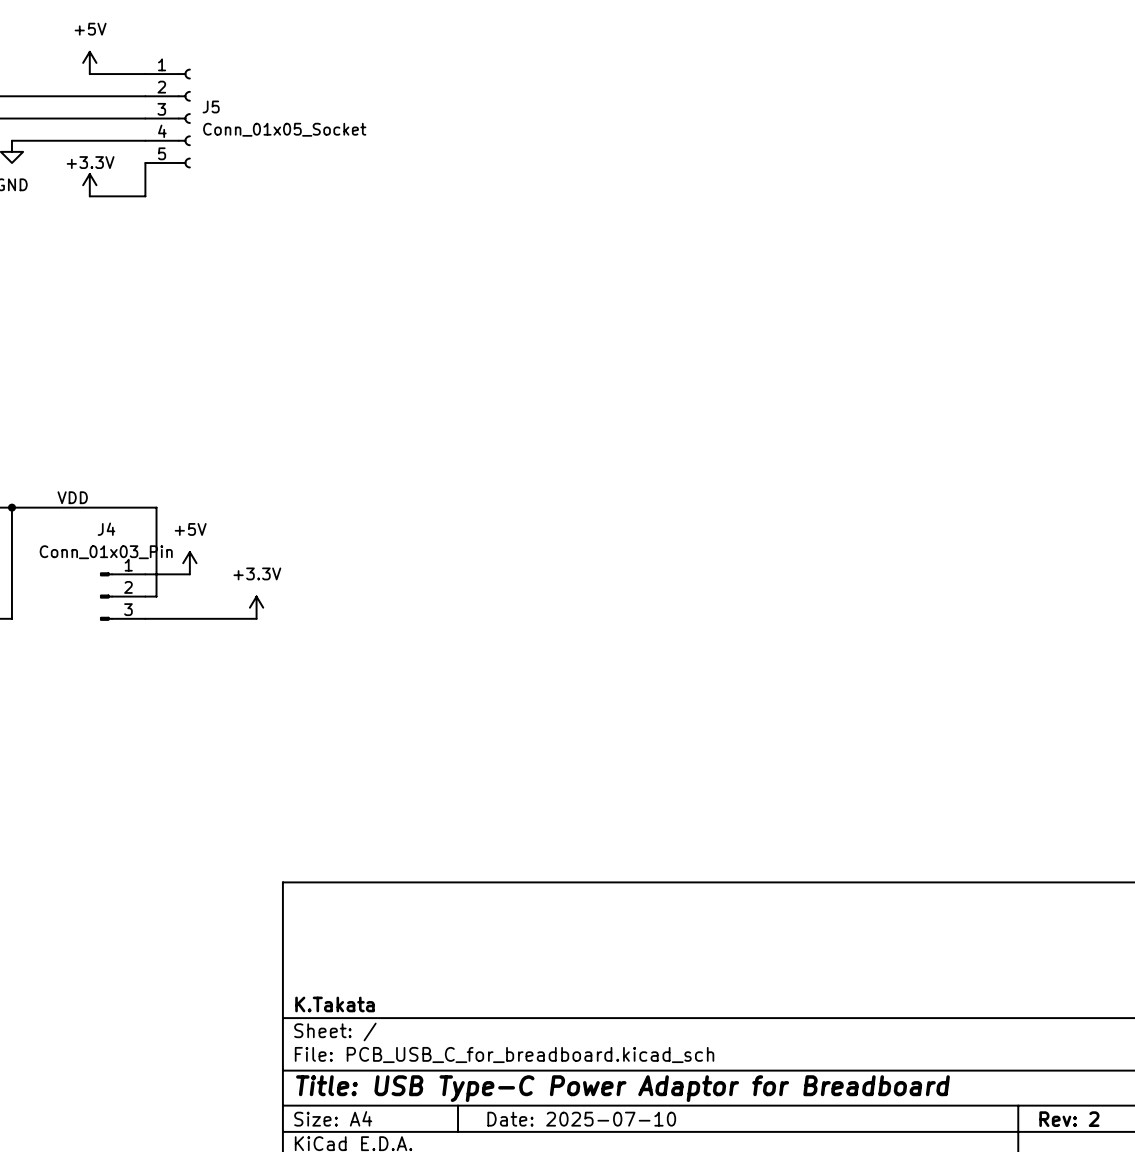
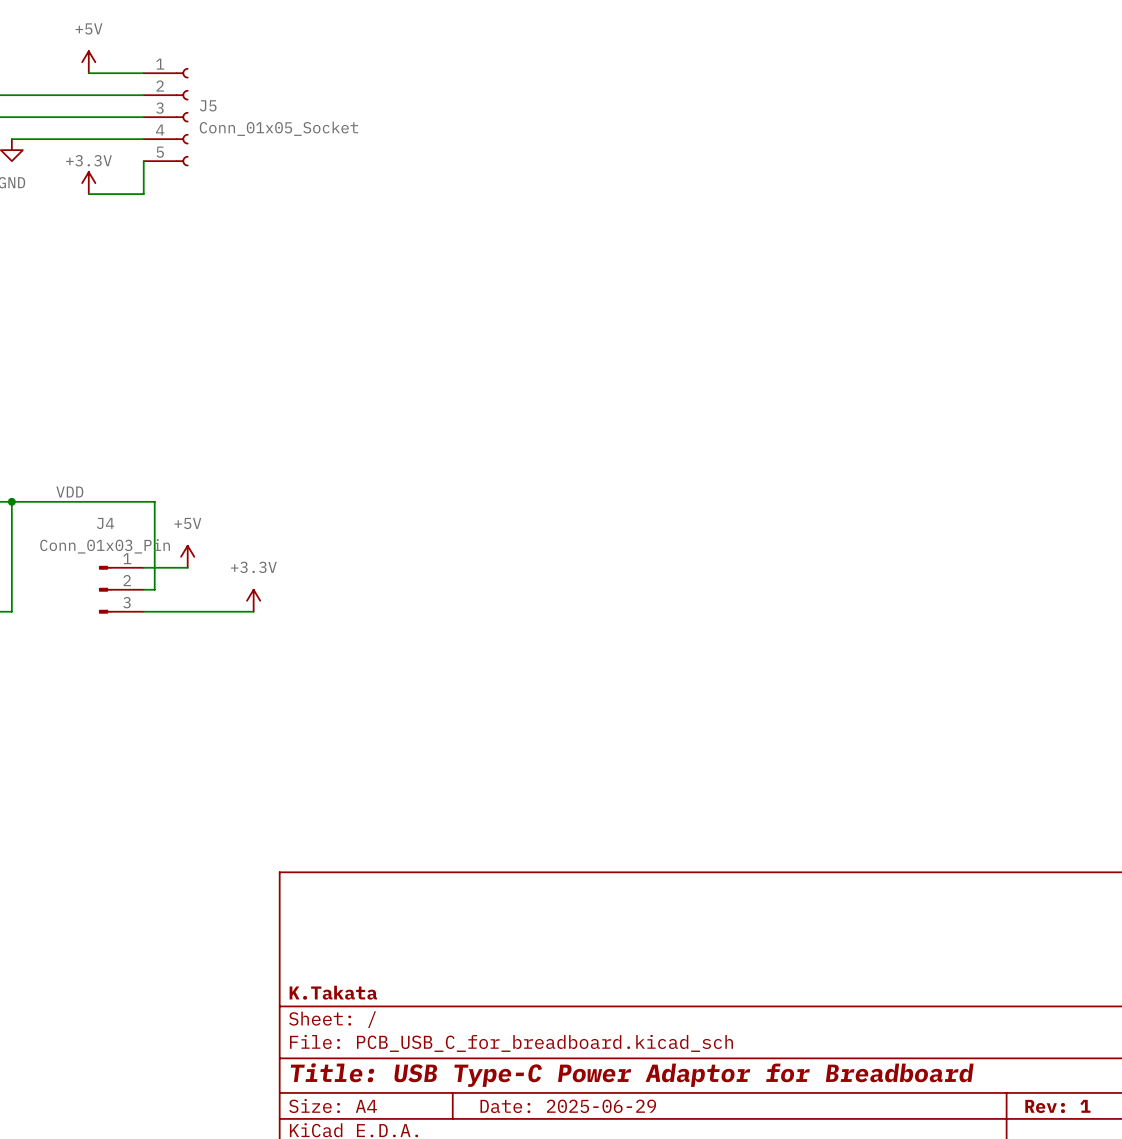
title block: Date: 2025-07-10 (581, 1119) -> Date: 2025-06-29 (568, 1106)
title block: Rev: 2 (1069, 1119) -> Rev: 1 (1057, 1106)

